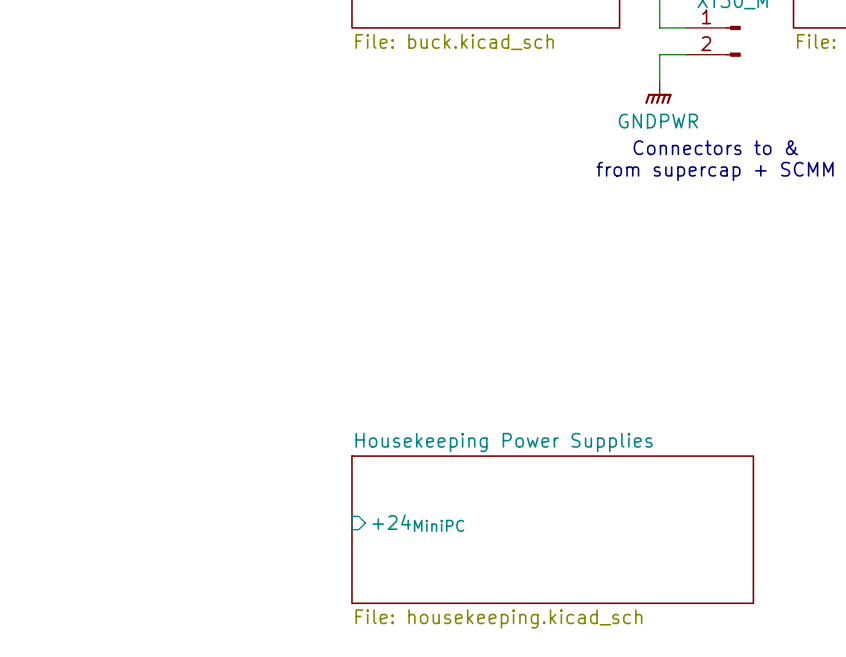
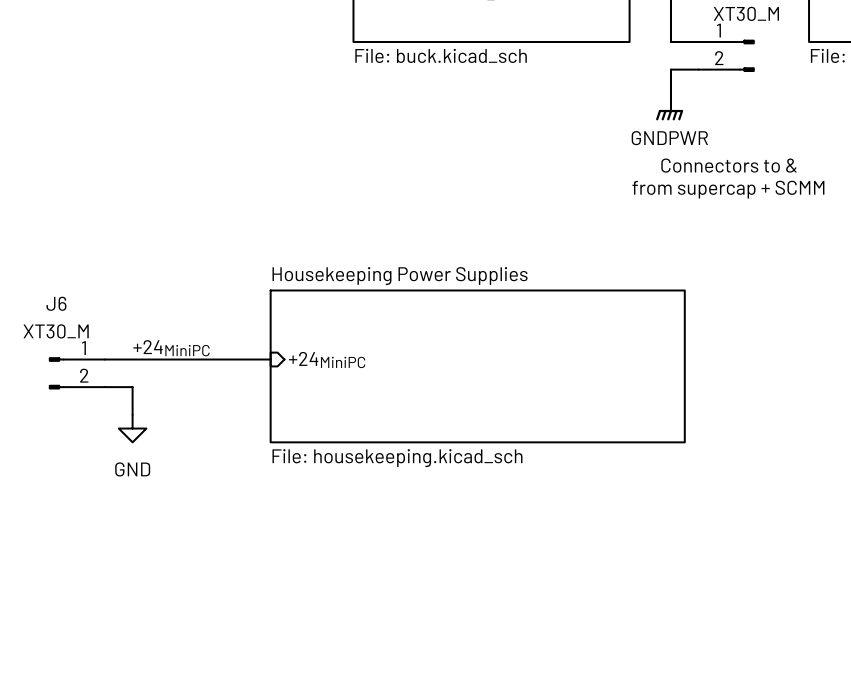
label: none -> +24MiniPC (171, 348)
wire: none -> (104, 359) (270, 359)
J6: none -> XT30_M (76, 373)
wire: none -> (104, 387) (132, 387) (132, 414)
power symbol: none -> GND (132, 428)
sheet pin position: +24MiniPC (418, 523) -> +24MiniPC (327, 360)
sheet Housekeeping Power Supplies position: (552, 529) -> (477, 366)

